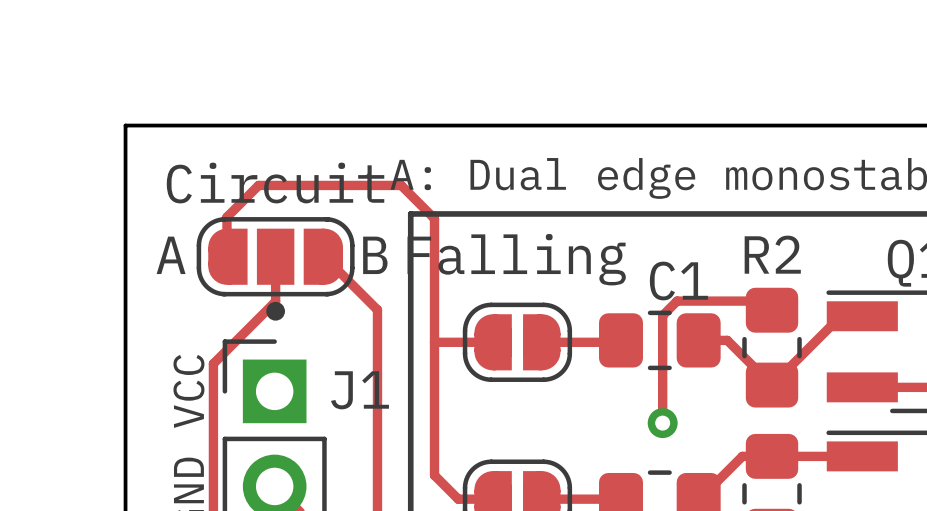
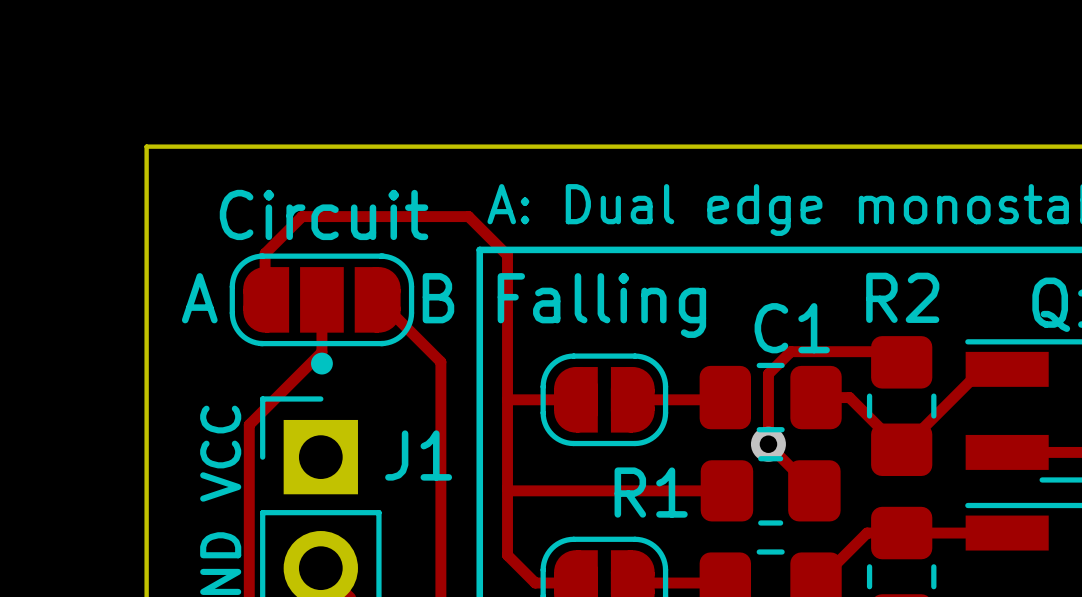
track: (662, 315) (662, 423) -> (774, 368) (768, 374) (768, 444) (814, 490)
track: none -> (507, 488) (509, 490) (726, 490)
R1: none -> (770, 490)
via position: (662, 423) -> (768, 444)

